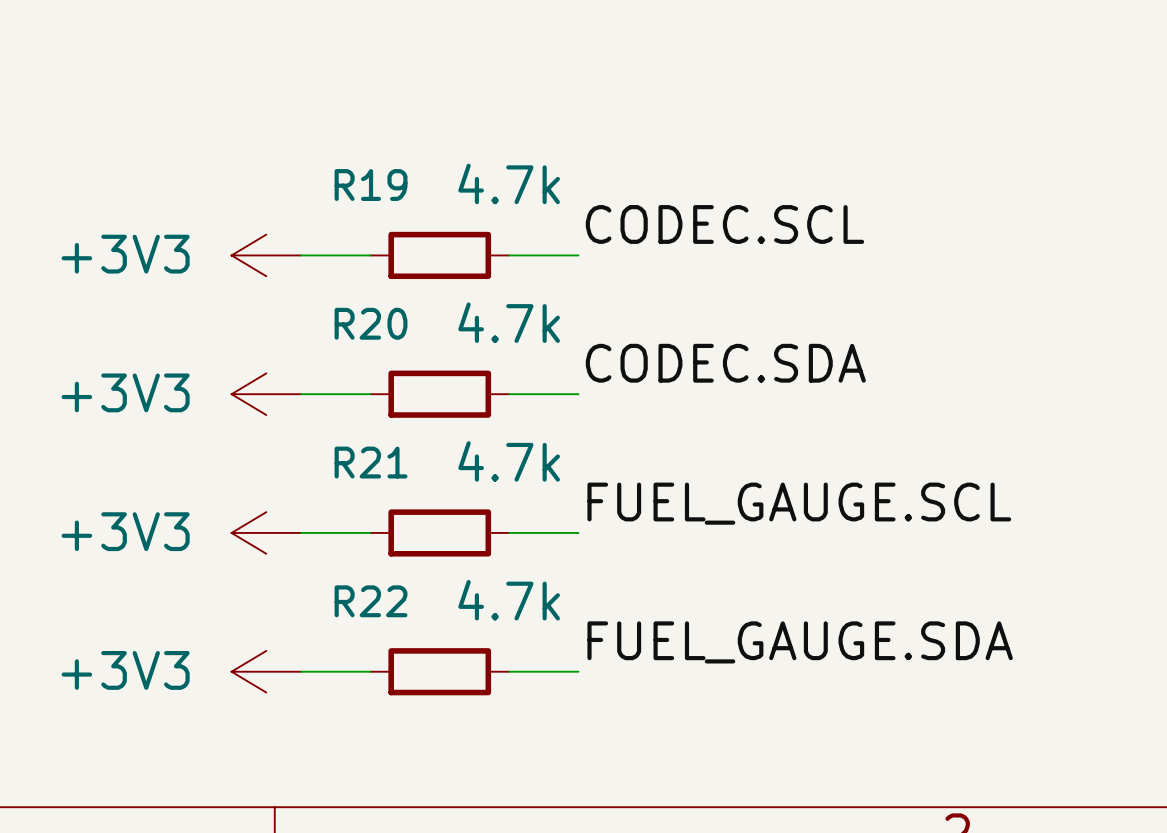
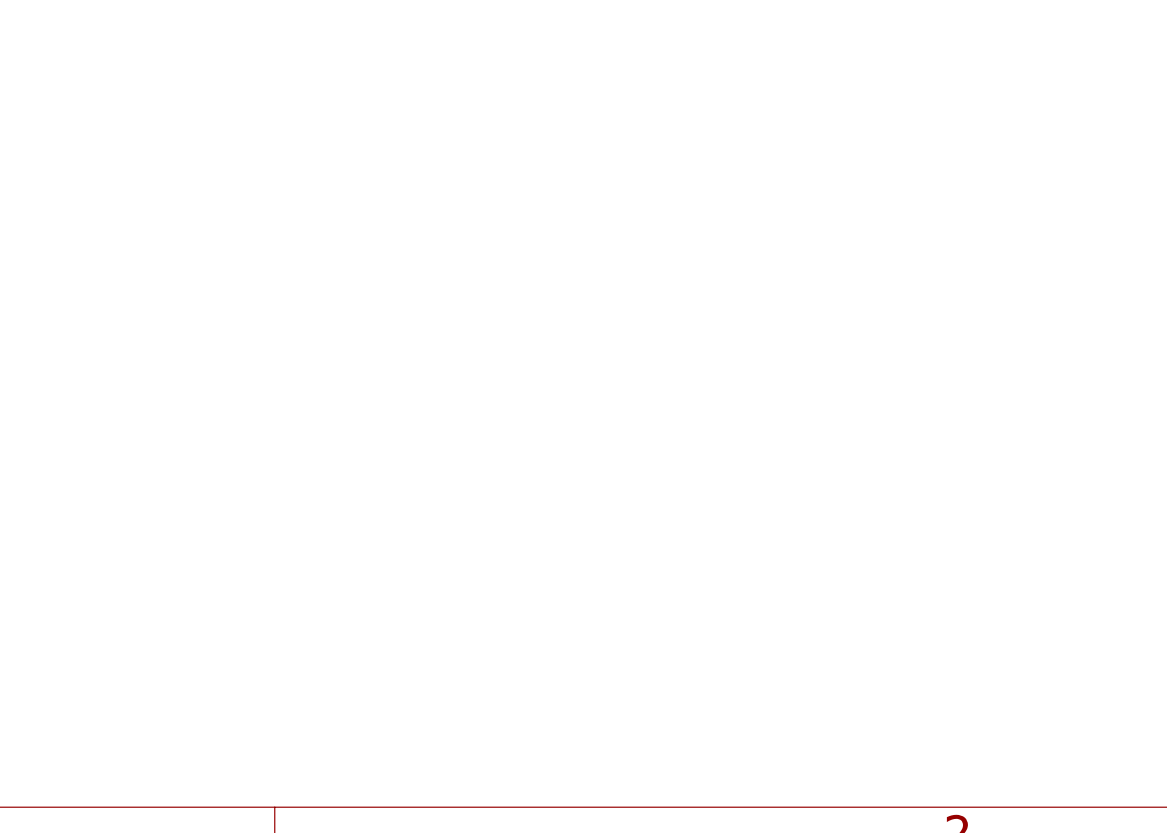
label: CODEC.SCL (724, 224) -> none
power symbol: +3V3 (266, 255) -> none
wire: (300, 255) (370, 255) -> none
R19: 4.7k (439, 255) -> none
wire: (509, 255) (578, 255) -> none
label: CODEC.SDA (725, 363) -> none
power symbol: +3V3 (266, 394) -> none
wire: (300, 394) (370, 394) -> none
R20: 4.7k (439, 394) -> none
wire: (509, 394) (578, 394) -> none
label: FUEL_GAUGE.SCL (799, 503) -> none
power symbol: +3V3 (266, 532) -> none
wire: (300, 532) (370, 532) -> none
R21: 4.7k (439, 532) -> none
wire: (509, 532) (578, 532) -> none
label: FUEL_GAUGE.SDA (800, 642) -> none
power symbol: +3V3 (266, 671) -> none
wire: (300, 671) (370, 671) -> none
R22: 4.7k (439, 671) -> none
wire: (509, 671) (578, 671) -> none

